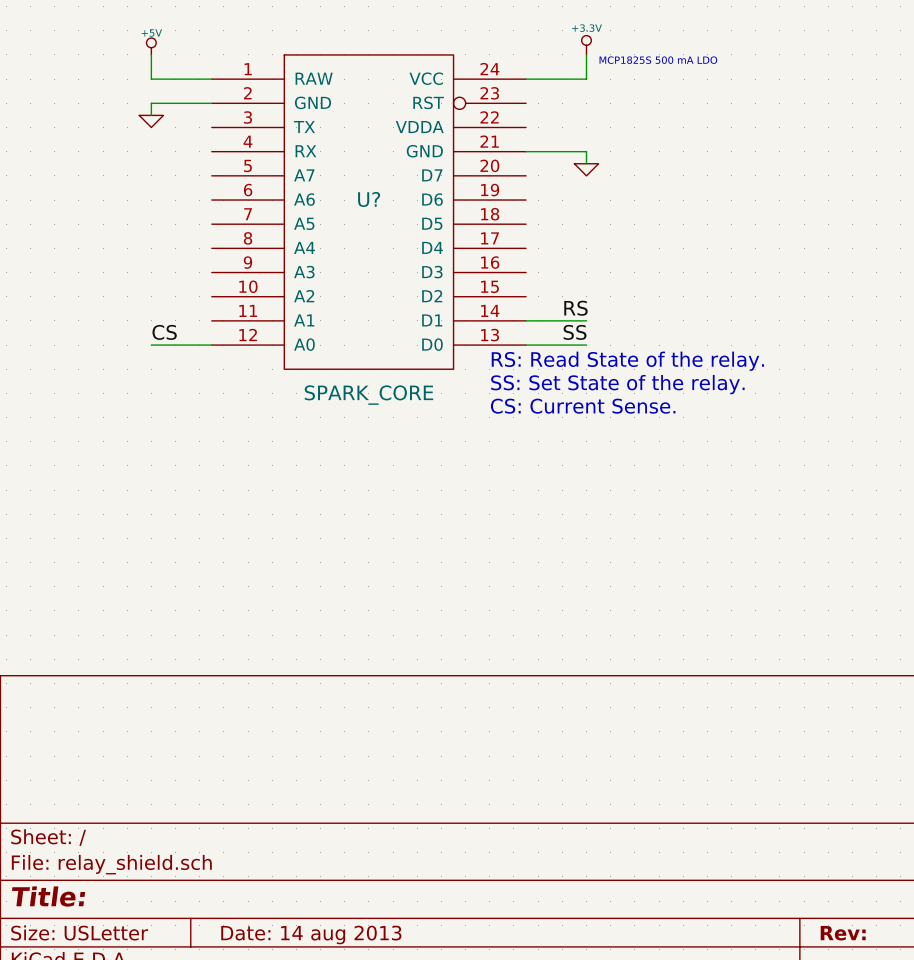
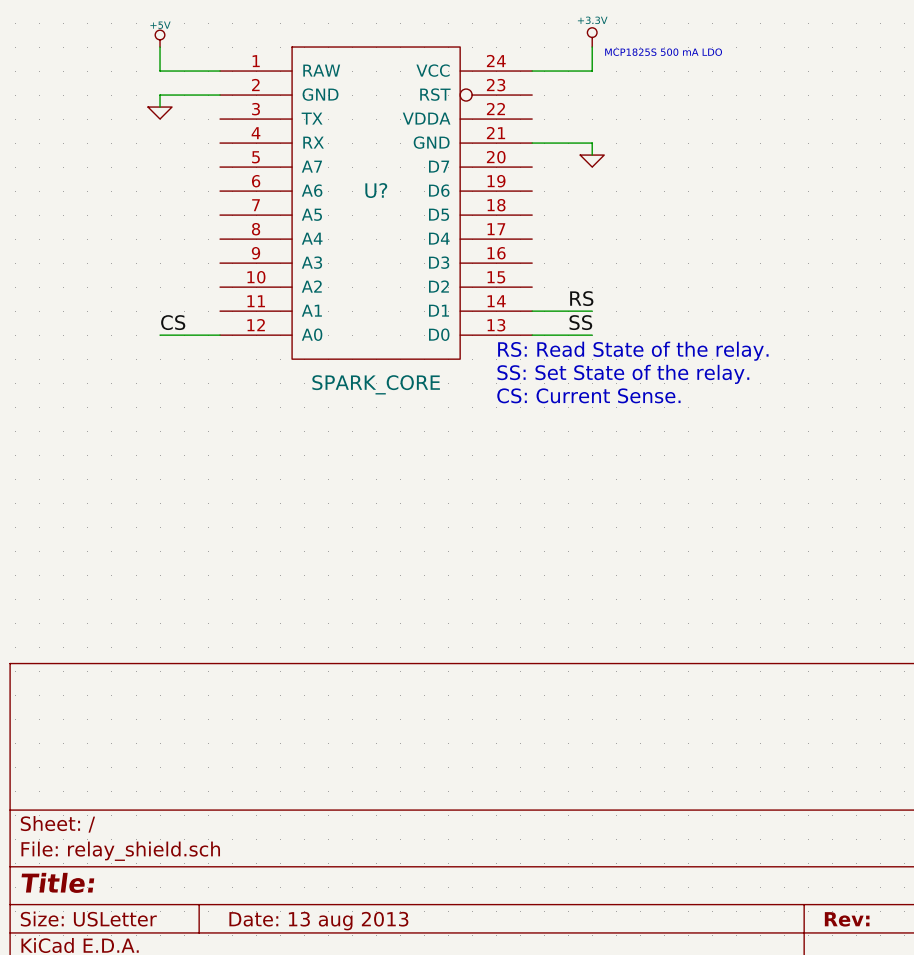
title block: Date: 14 aug 2013 (311, 934) -> Date: 13 aug 2013 (318, 921)

